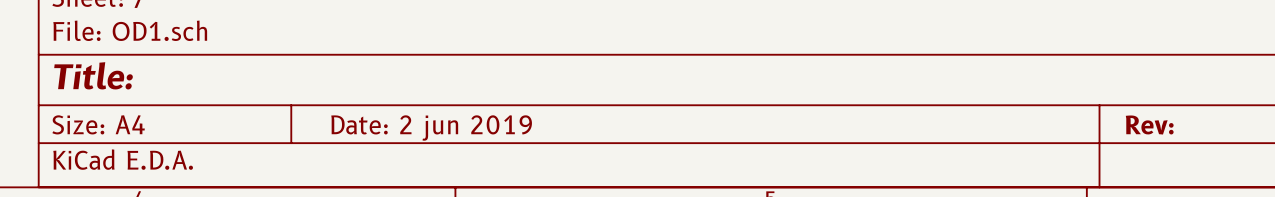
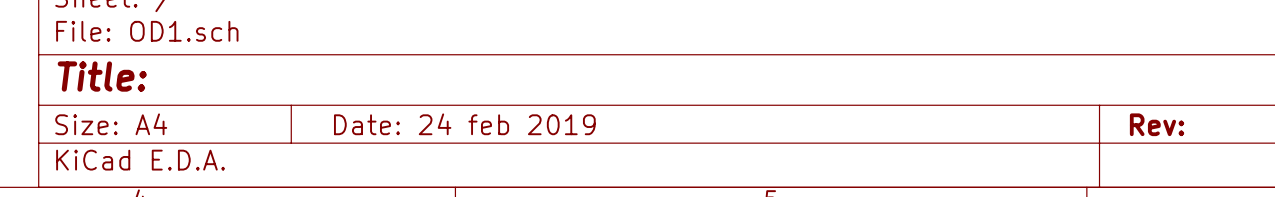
title block: Date: 2 jun 2019 (431, 127) -> Date: 24 feb 2019 (464, 124)

